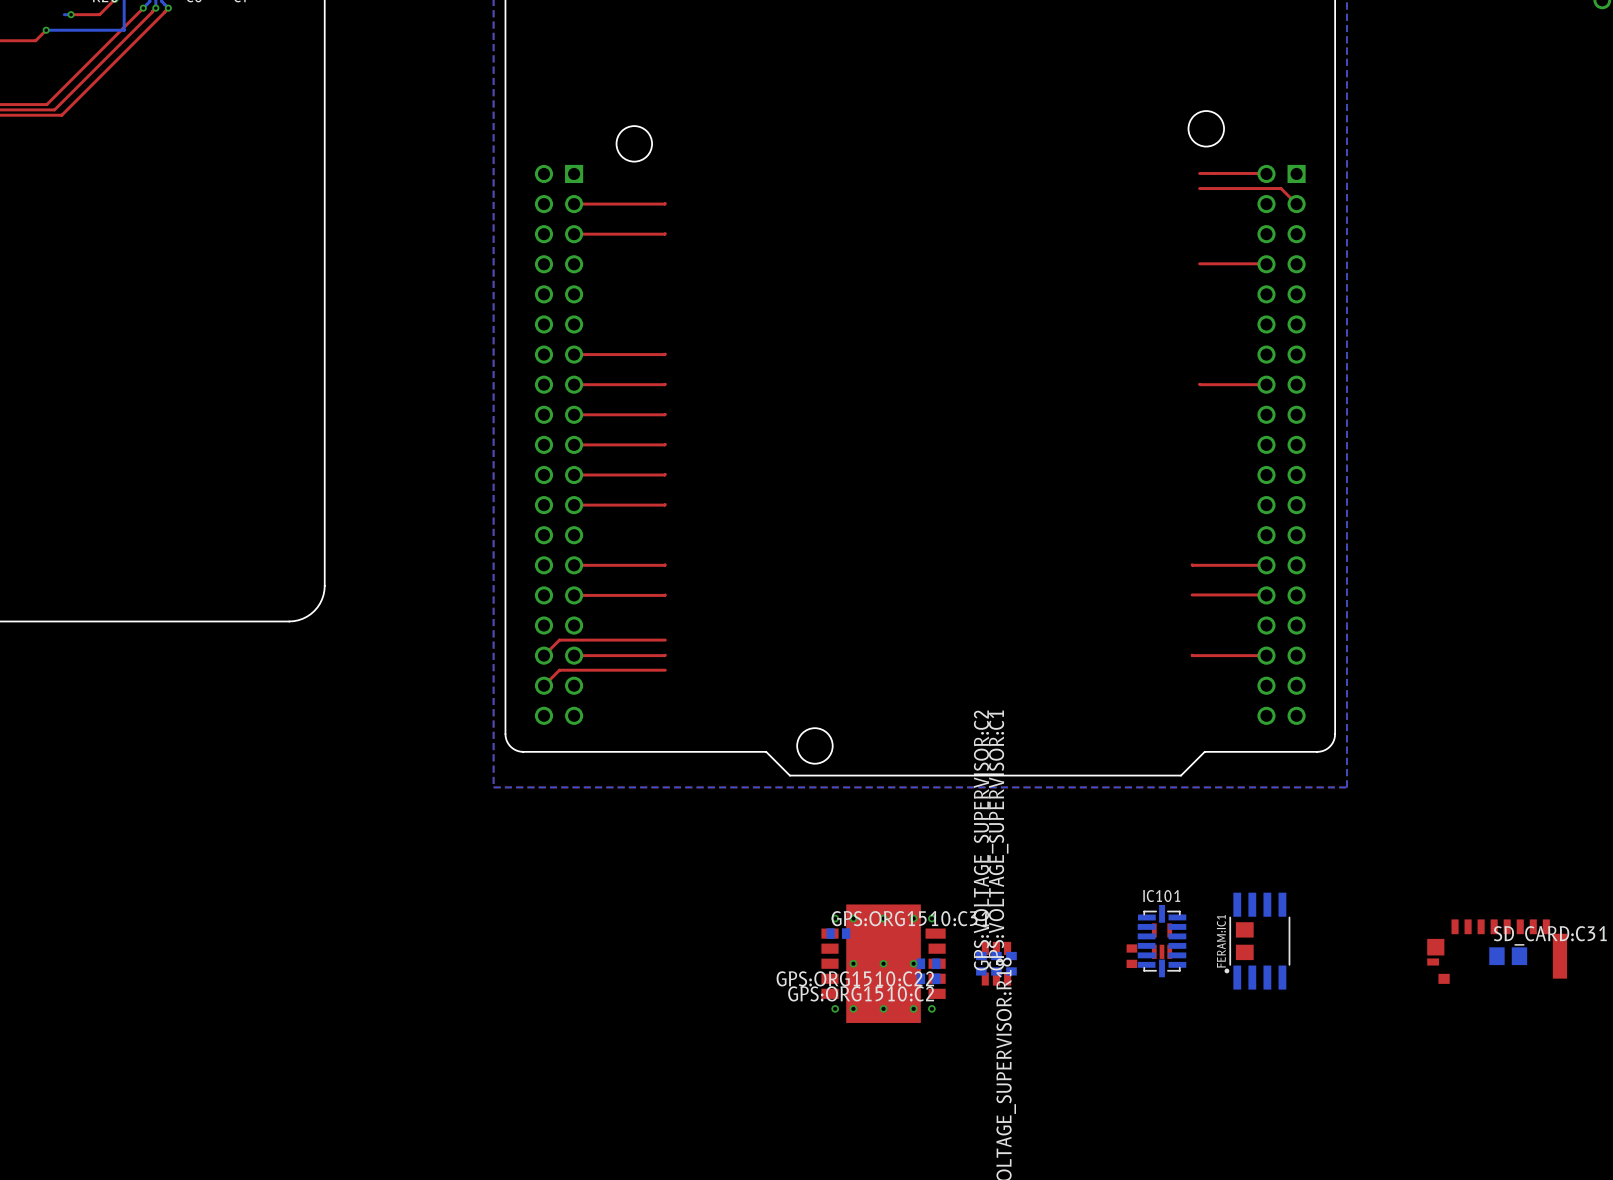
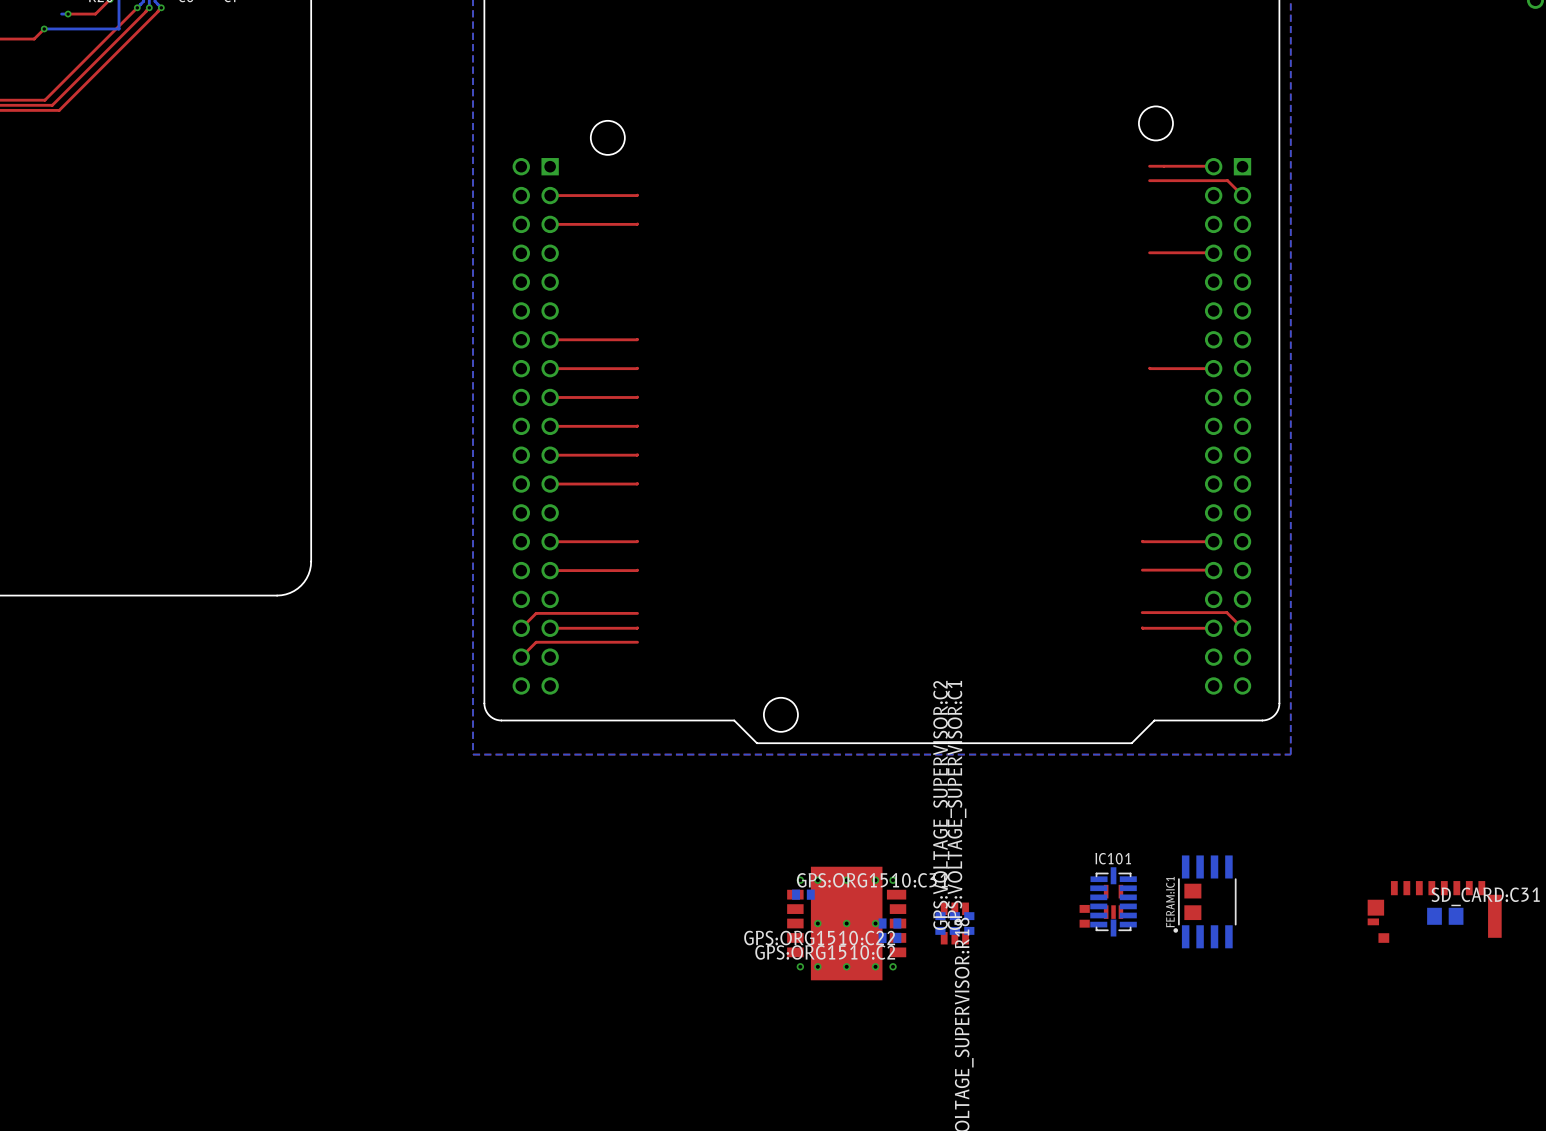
top track: none -> (1142, 612) (1226, 612) (1242, 628)

